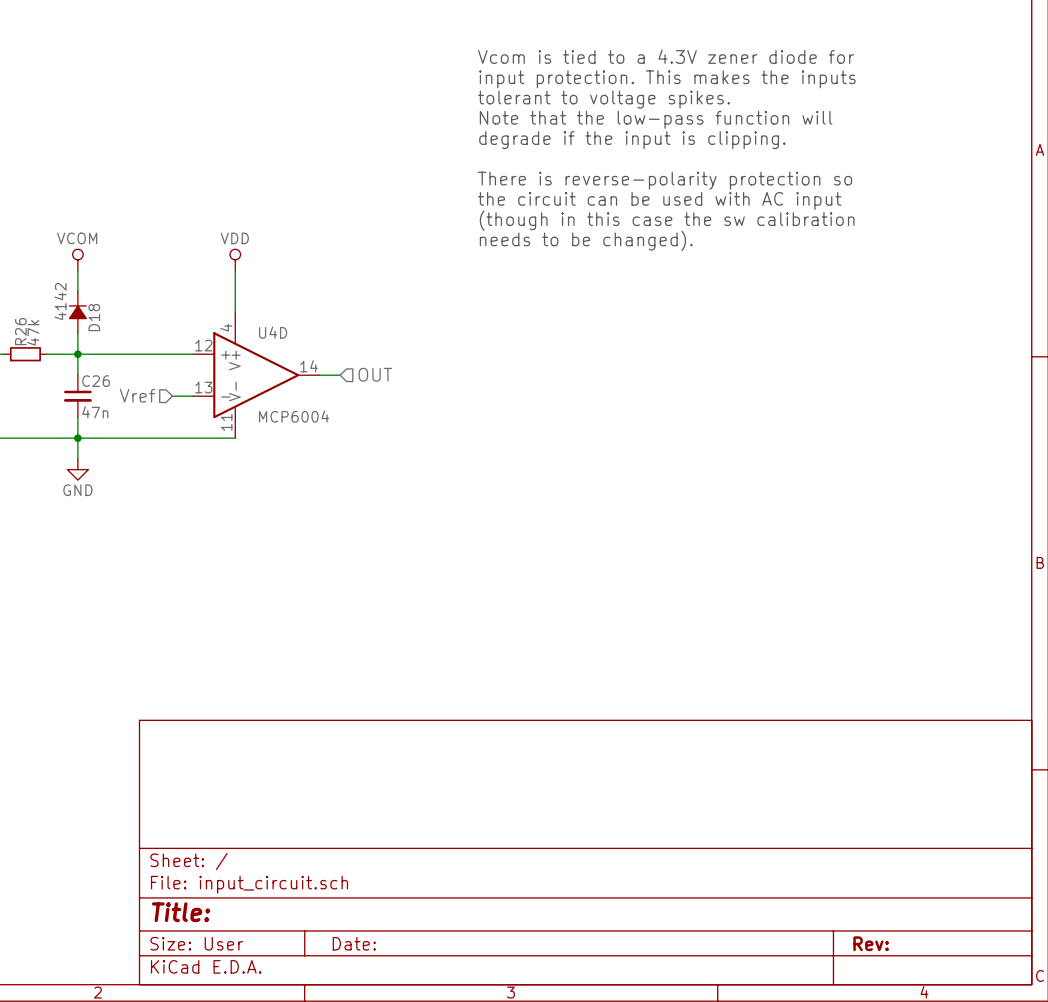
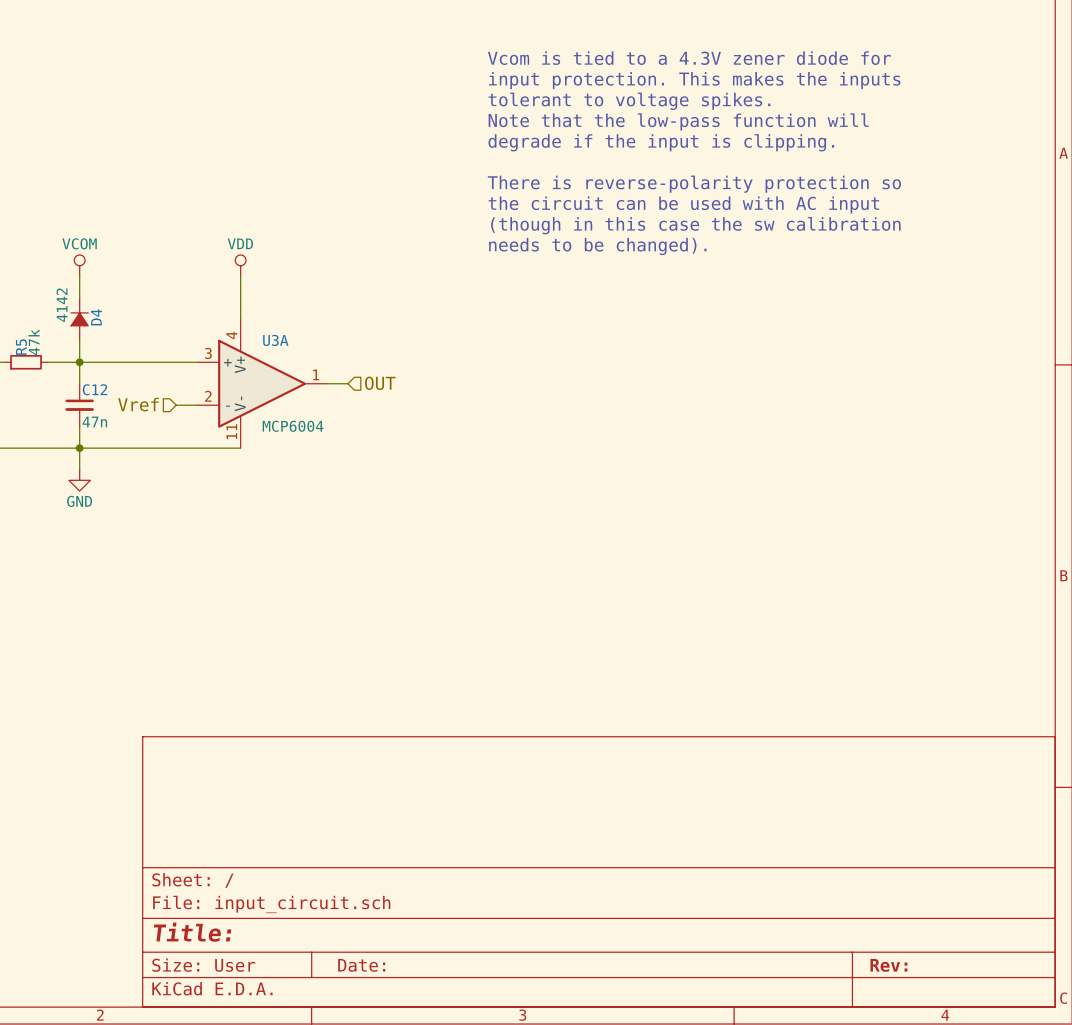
D18 name: D18 (94, 317) -> D4 (96, 317)
R26 name: R26 (20, 331) -> R5 (21, 347)
U4D name: U4D (273, 332) -> U3A (275, 340)
U4D pin number: 12 (203, 345) -> 3 (208, 353)
U4D pin number: 14 (308, 366) -> 1 (316, 374)
C26 name: C26 (96, 381) -> C12 (94, 389)
U4D pin number: 13 (203, 387) -> 2 (208, 396)

